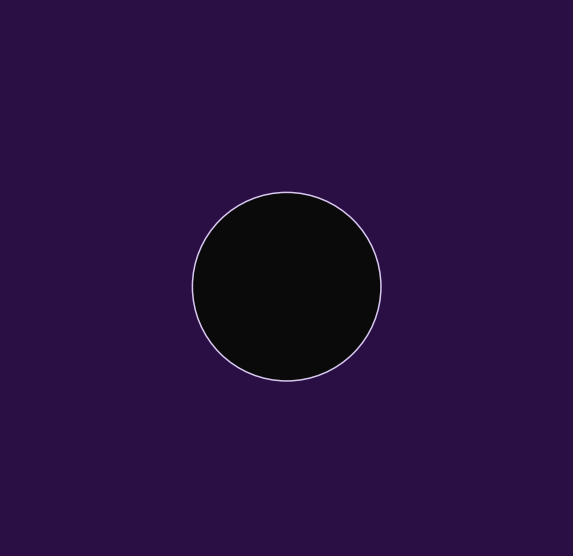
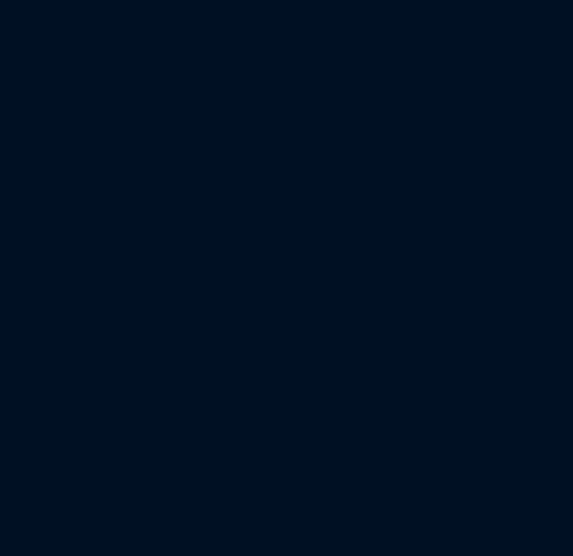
hole: (286, 286) -> none

